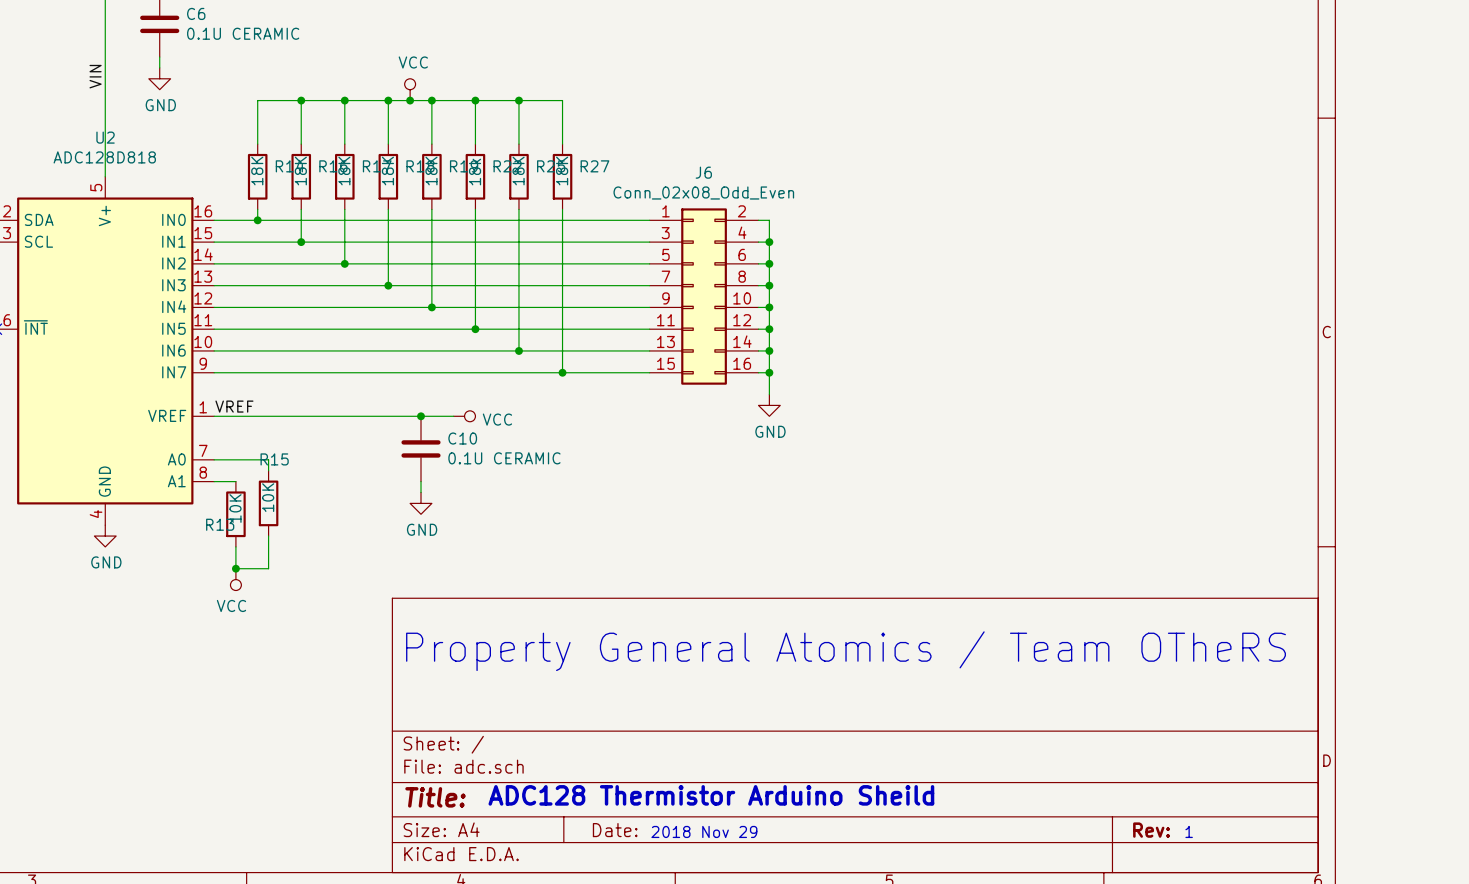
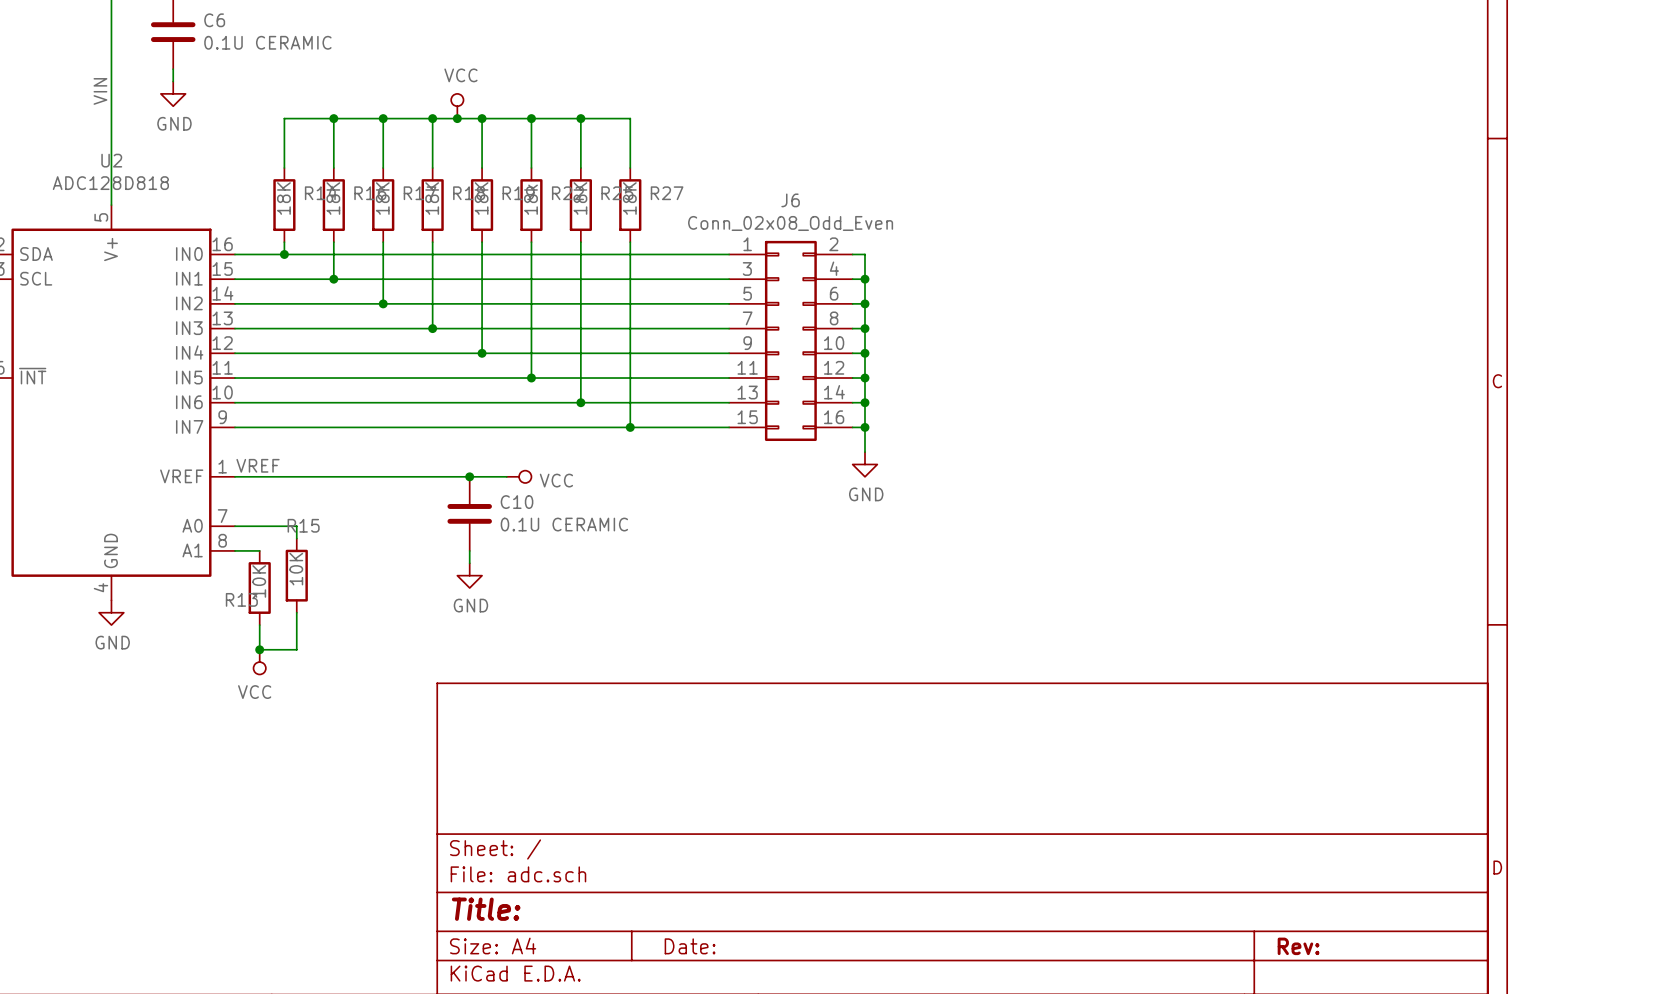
text: Property General Atomics / Team OTheRS (846, 651) -> none
text: ADC128 Thermistor Arduino Sheild (711, 795) -> none
text: 2018 Nov 29 (704, 831) -> none
text: 1 (1189, 831) -> none

